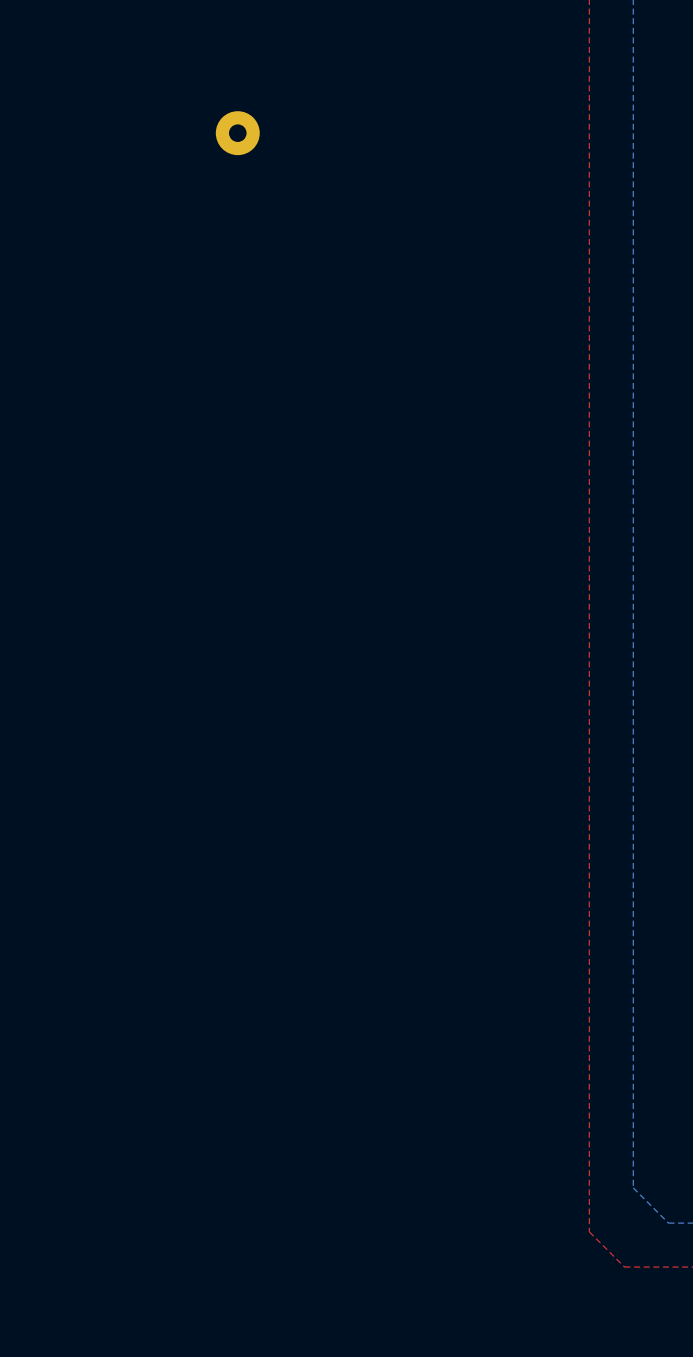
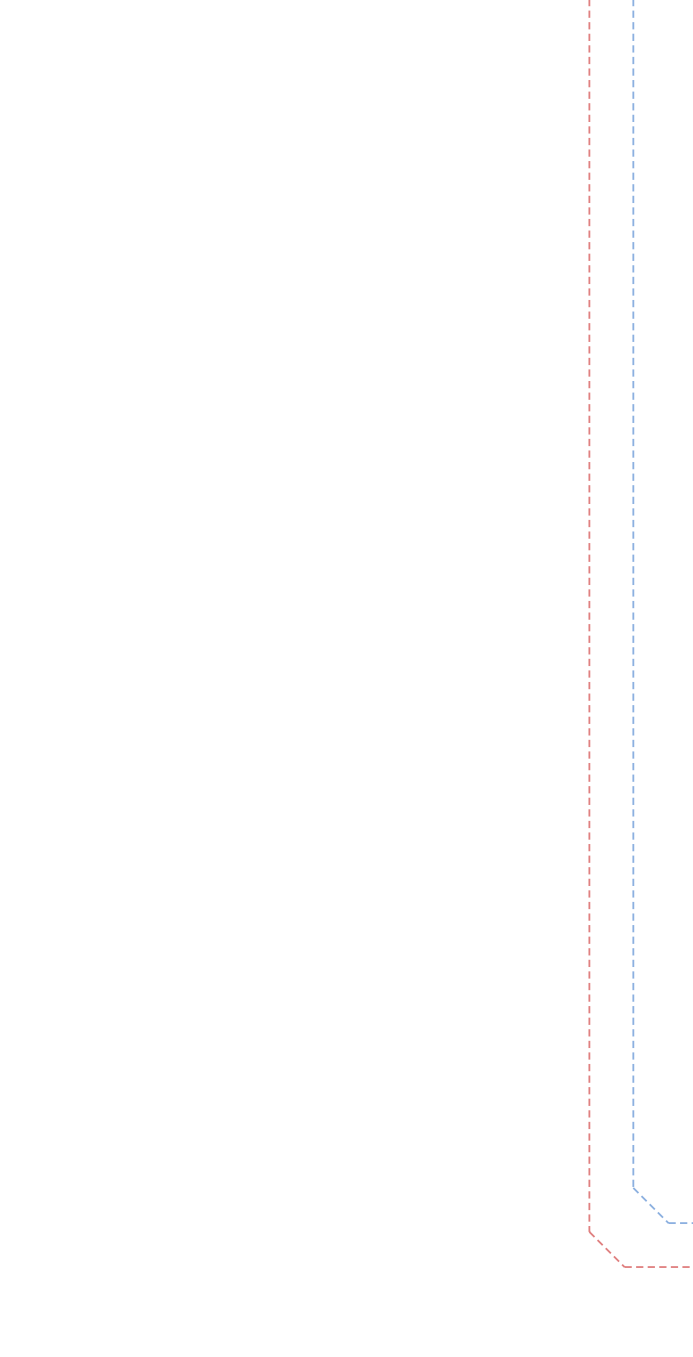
part: (237, 133) -> none

